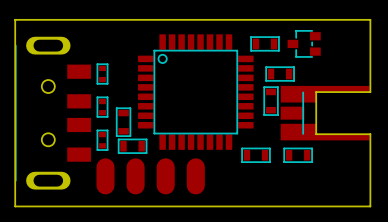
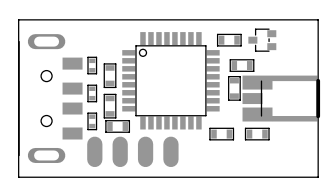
part: none -> (110, 75)
board edge: (370, 92) (316, 92) (316, 134) (370, 134) -> (318, 80) (318, 116)

